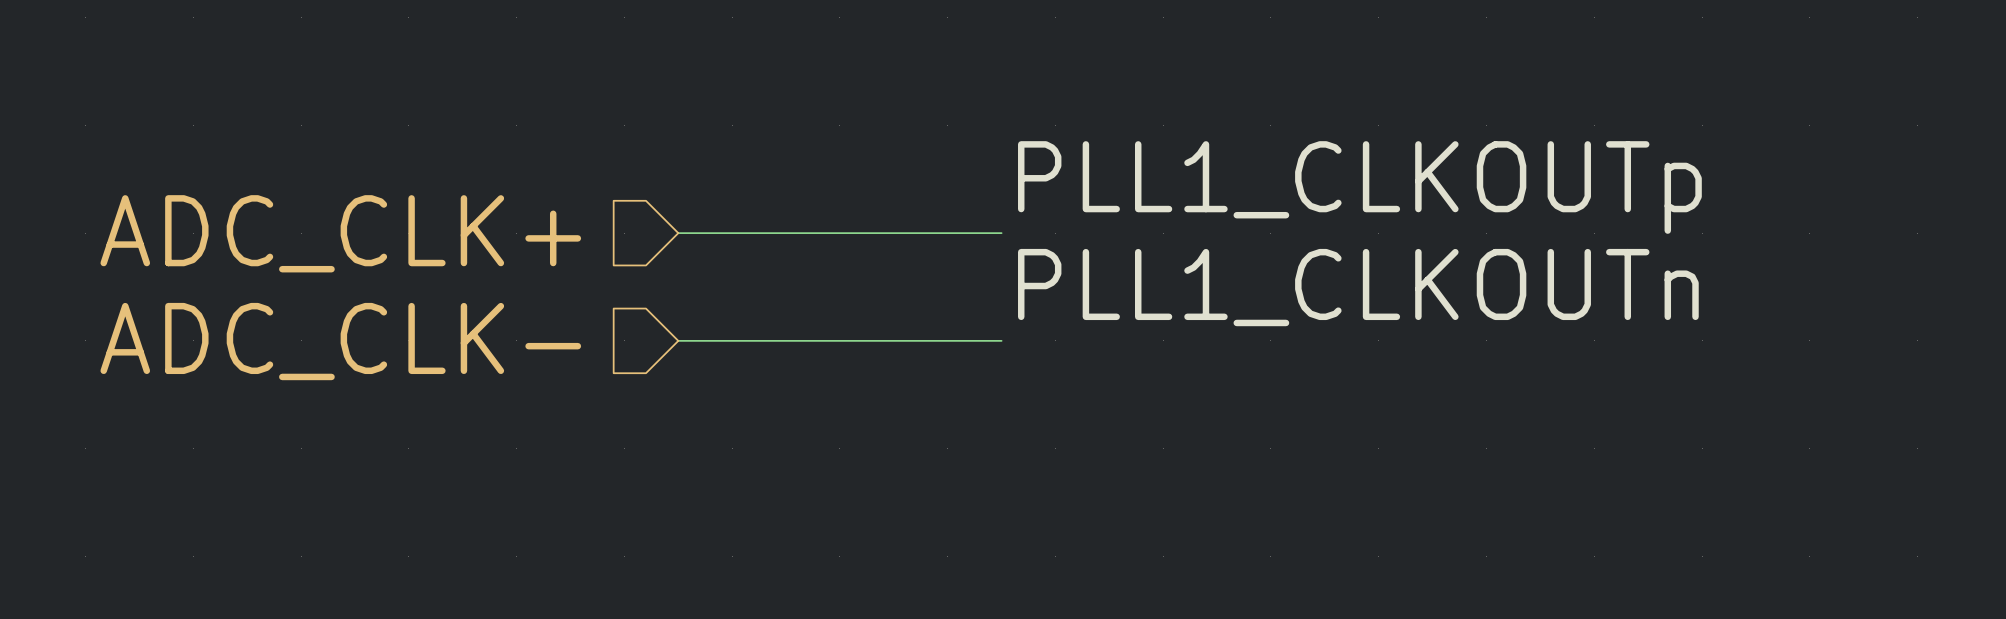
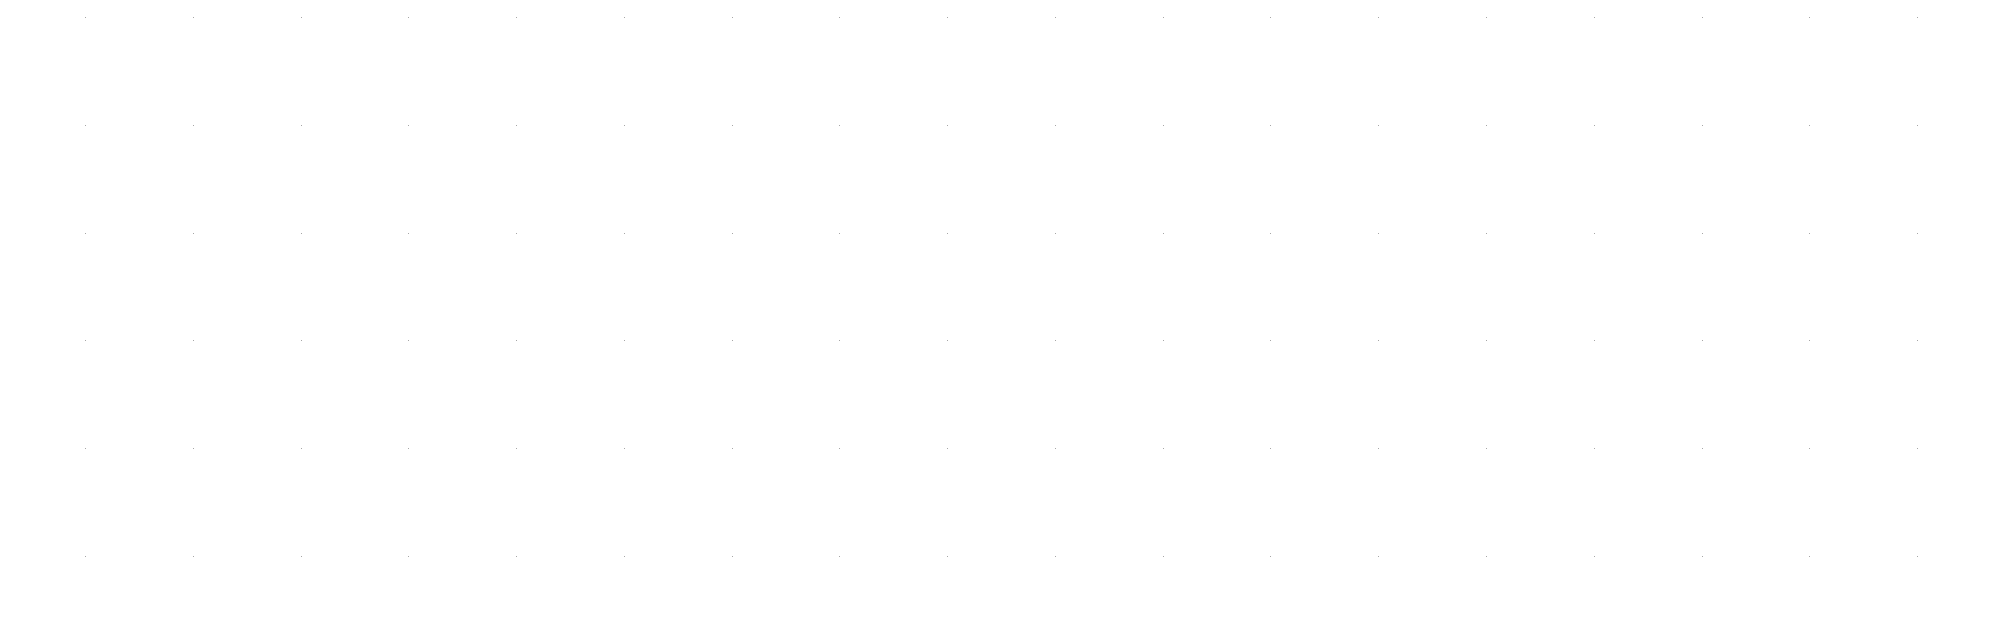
label: PLL1_CLKOUTp (1359, 187) -> none
hierarchical label: ADC_CLK+ (340, 233) -> none
wire: (678, 233) (1001, 233) -> none
label: PLL1_CLKOUTn (1358, 287) -> none
wire: (678, 340) (1001, 340) -> none
hierarchical label: ADC_CLK- (340, 341) -> none

